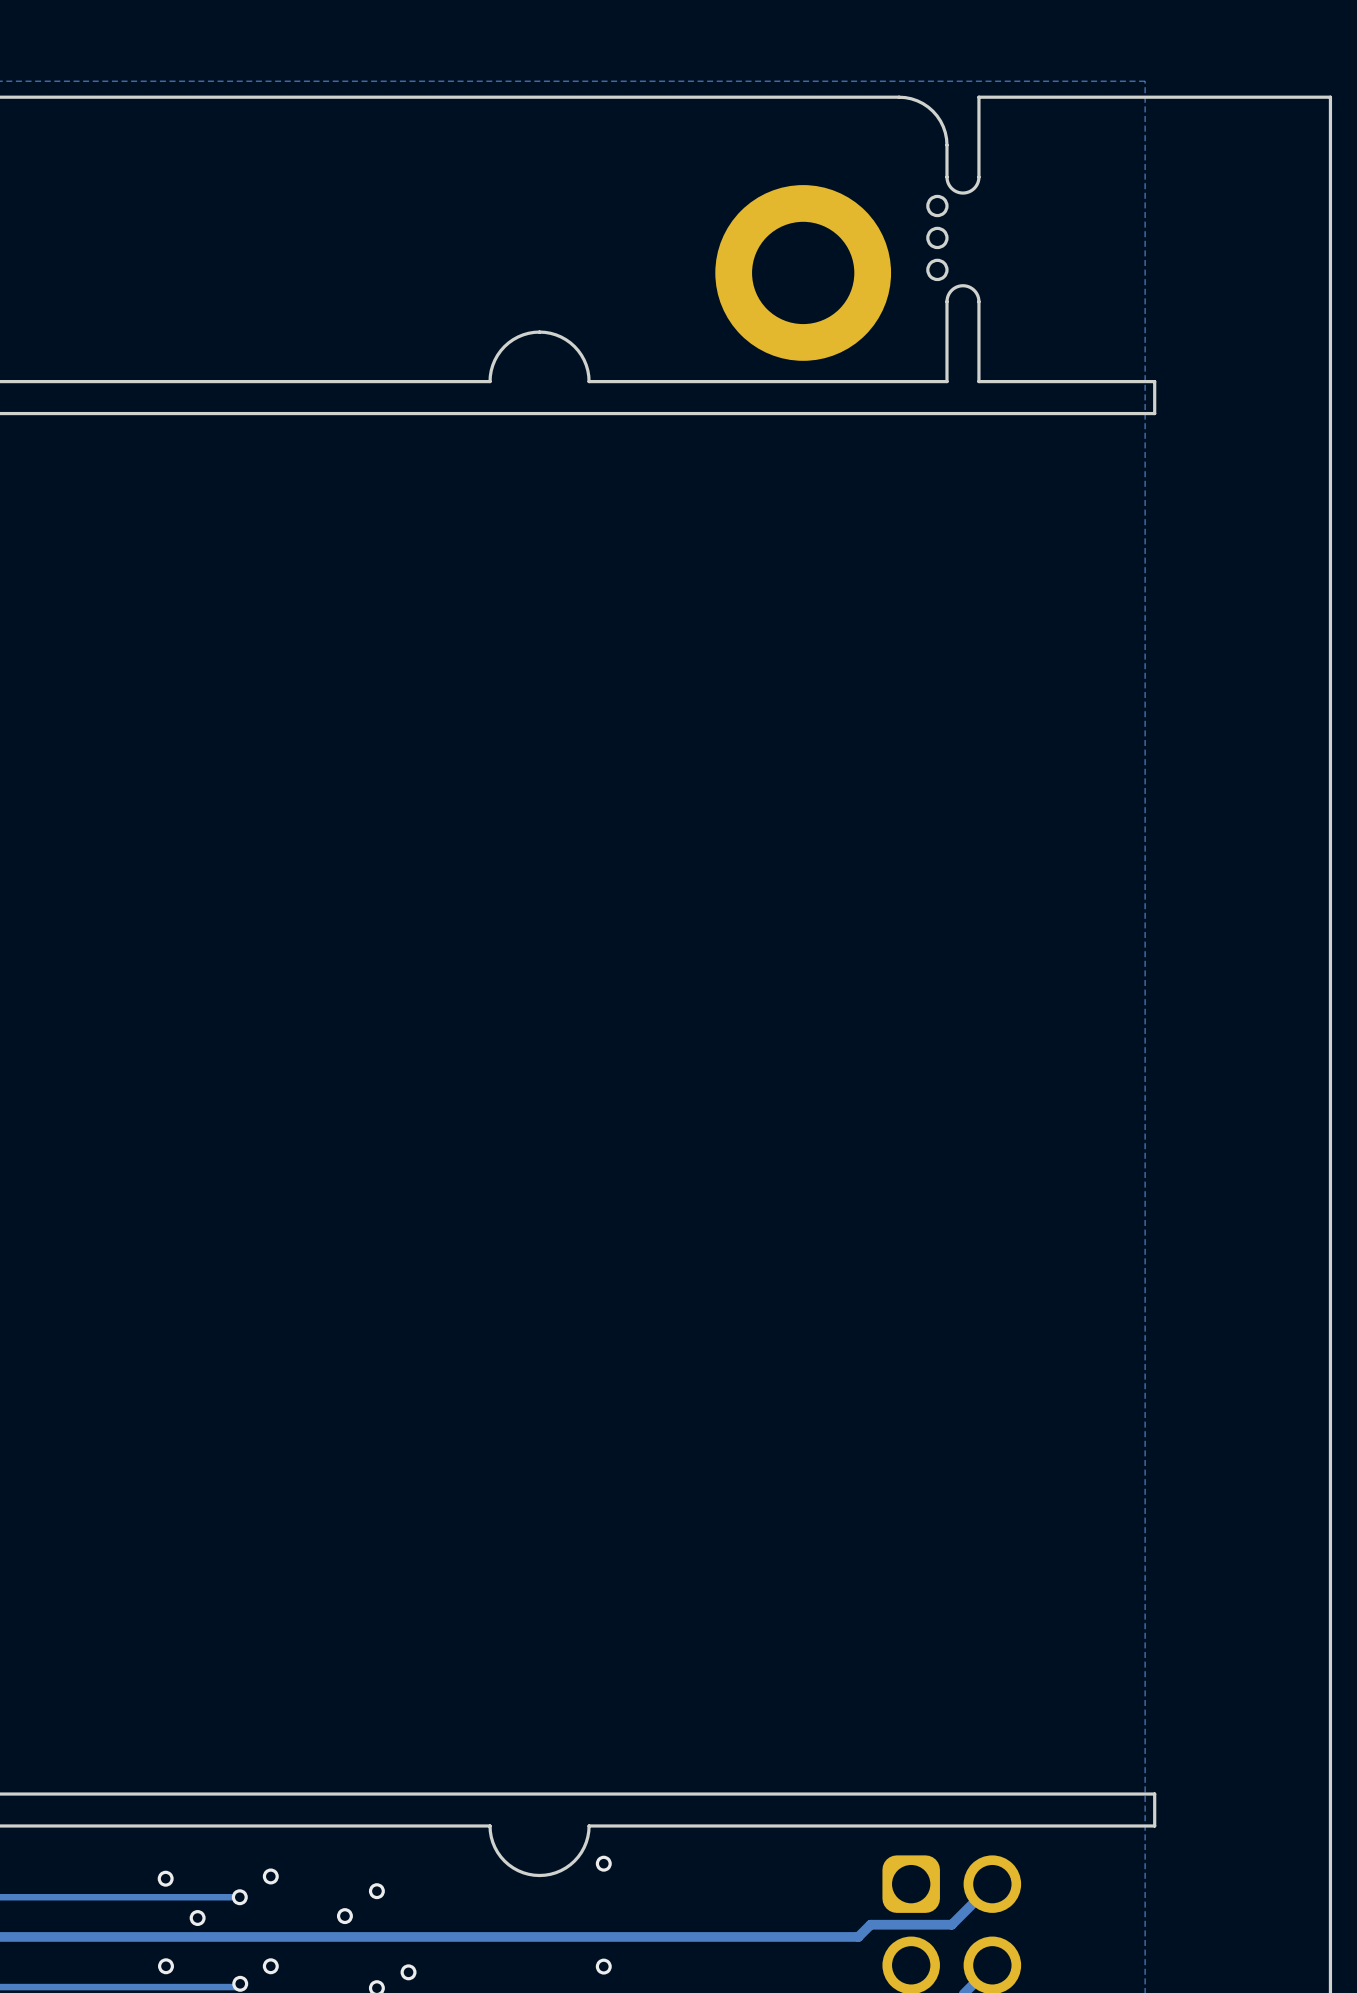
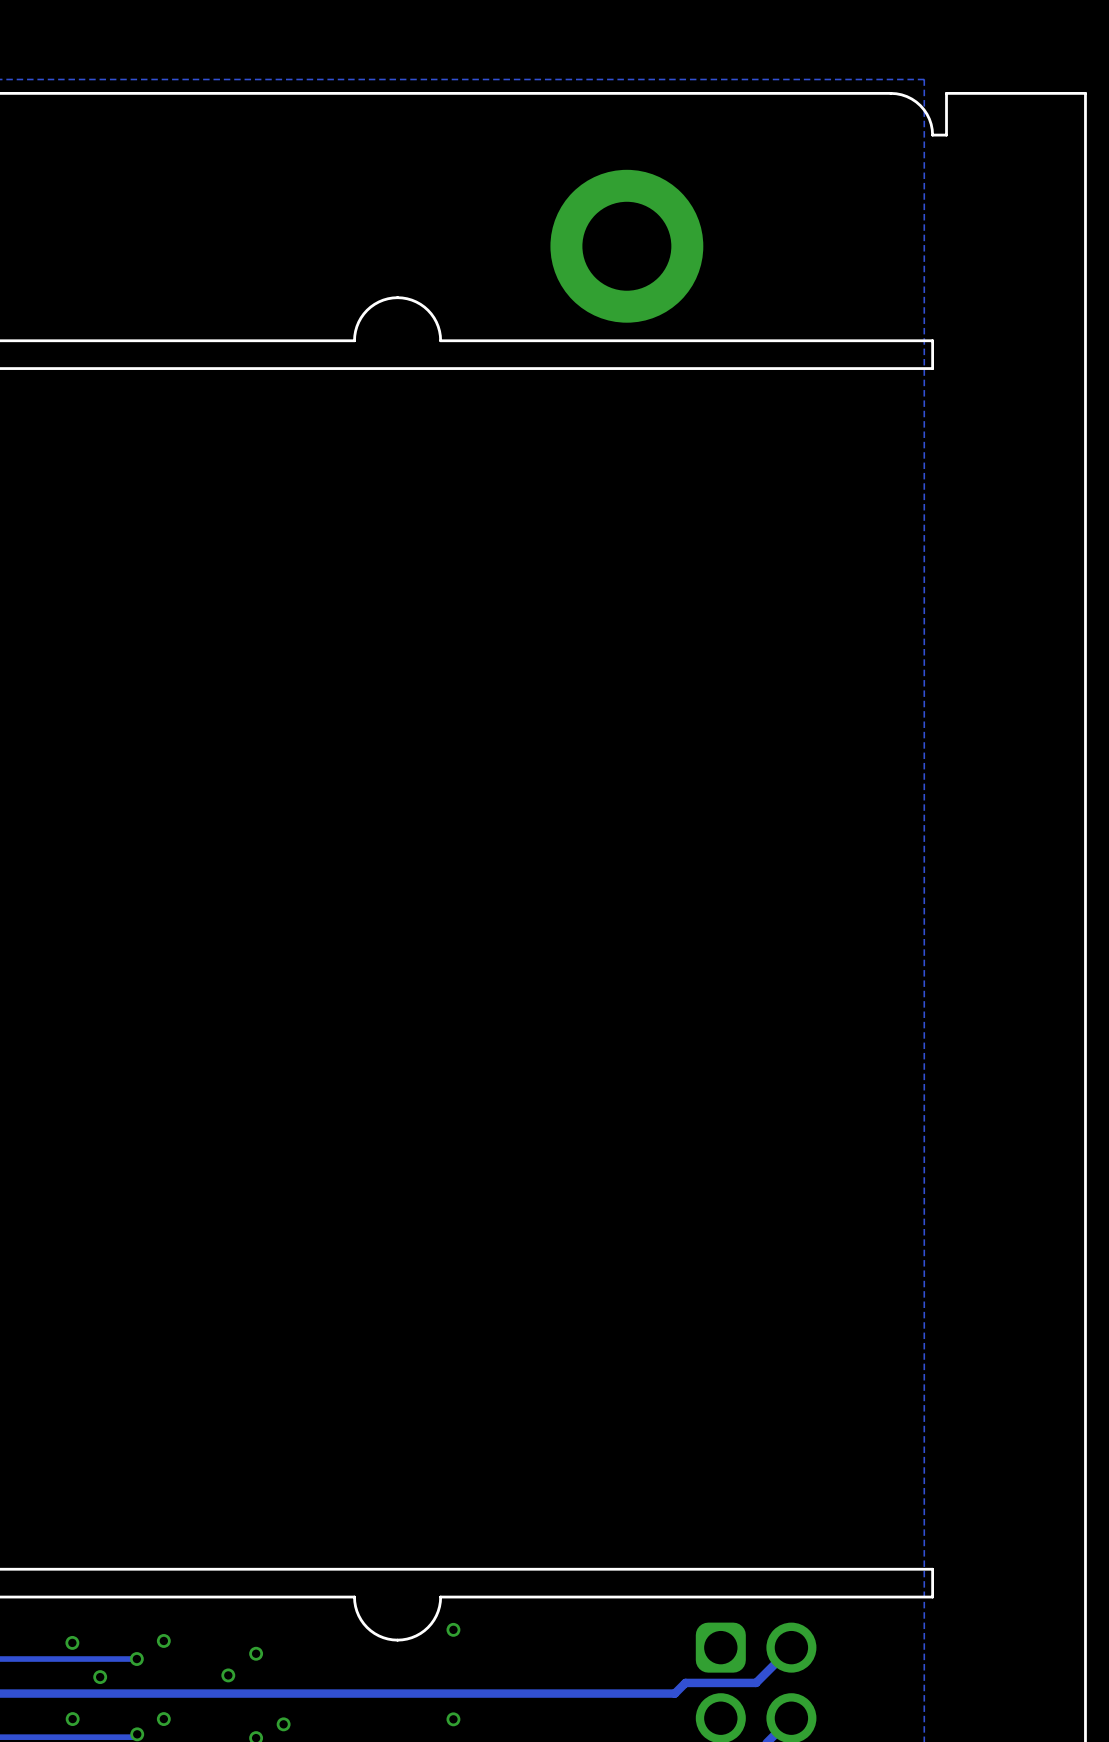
board edge: (978, 97) (978, 179) (974, 188) (962, 193) (953, 189) (947, 181) (946, 138) (940, 121) (932, 111) (923, 103) (911, 98) (899, 97) -> (779, 93) (710, 93)
board edge: (1170, 97) (1106, 97) -> (946, 93) (946, 135) (932, 135) (929, 119) (920, 105) (906, 96) (890, 93)
round board edge: [926, 194, 949, 218] -> none
round board edge: [926, 226, 949, 250] -> none
round board edge: [926, 258, 949, 282] -> none
board edge: (978, 381) (978, 299) (973, 289) (962, 285) (952, 289) (947, 299) (946, 381) -> (779, 340) (751, 340)

